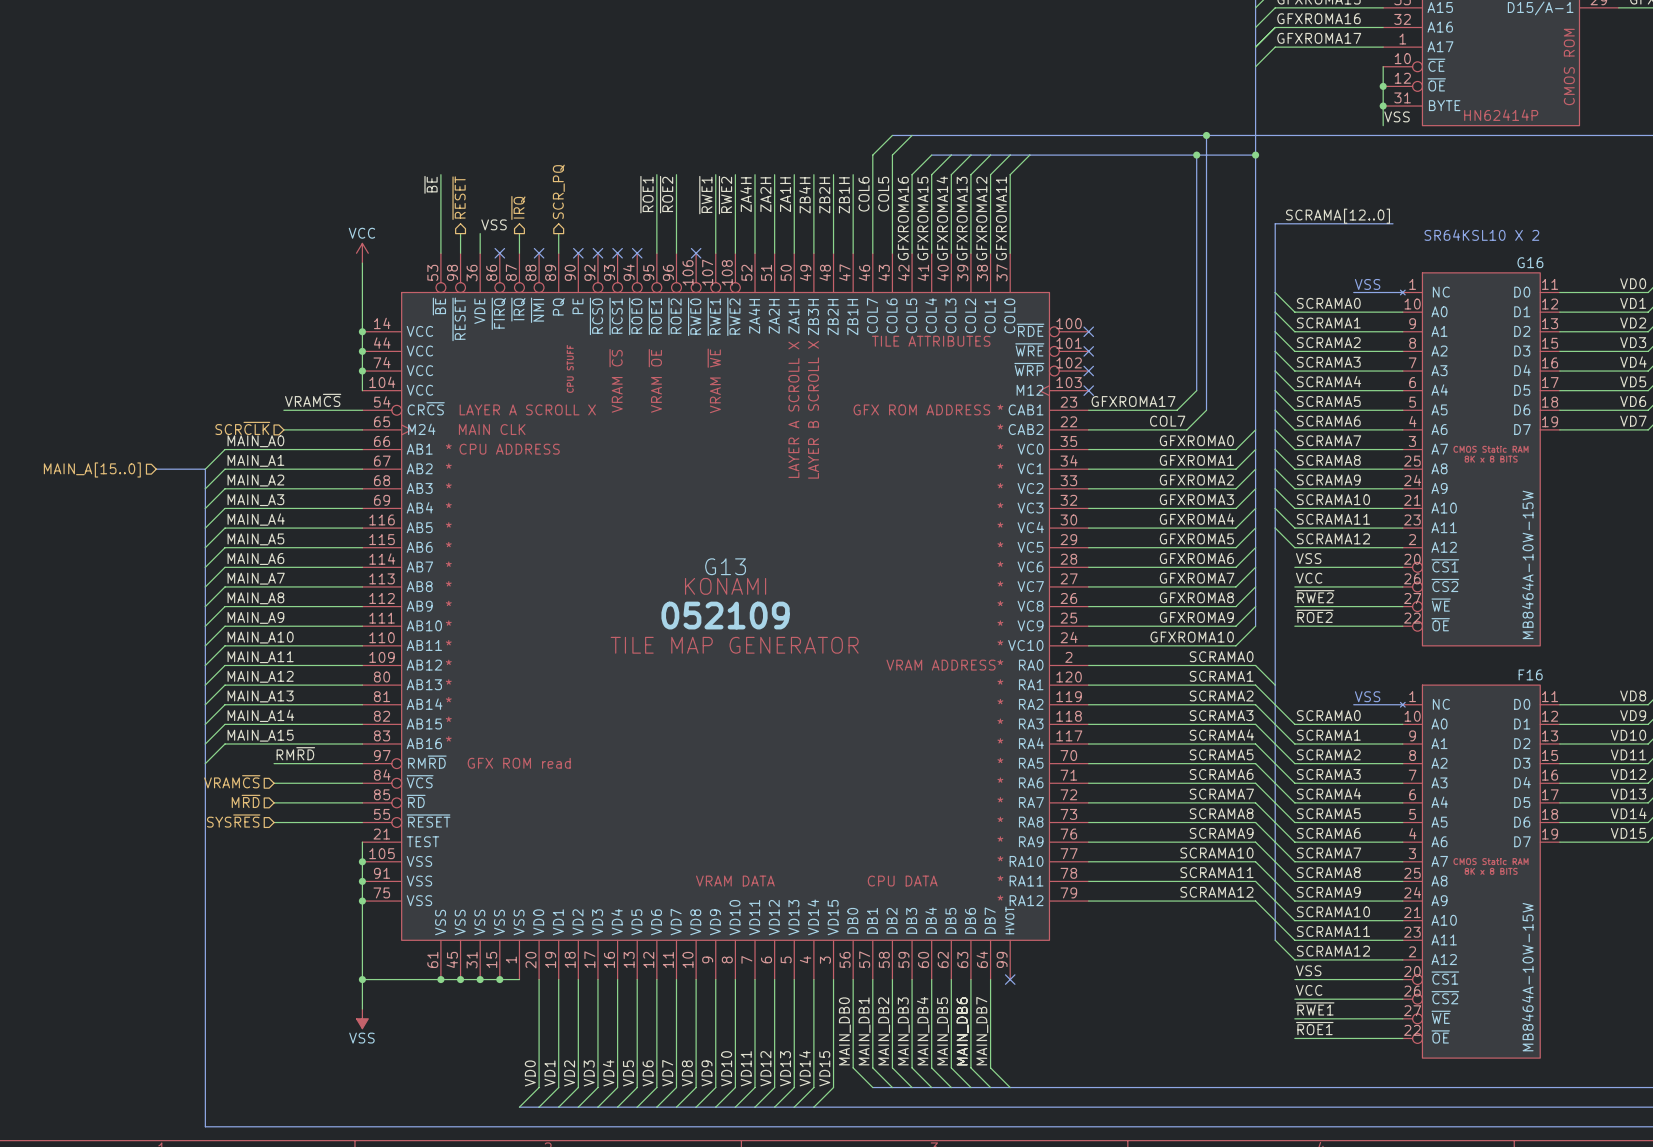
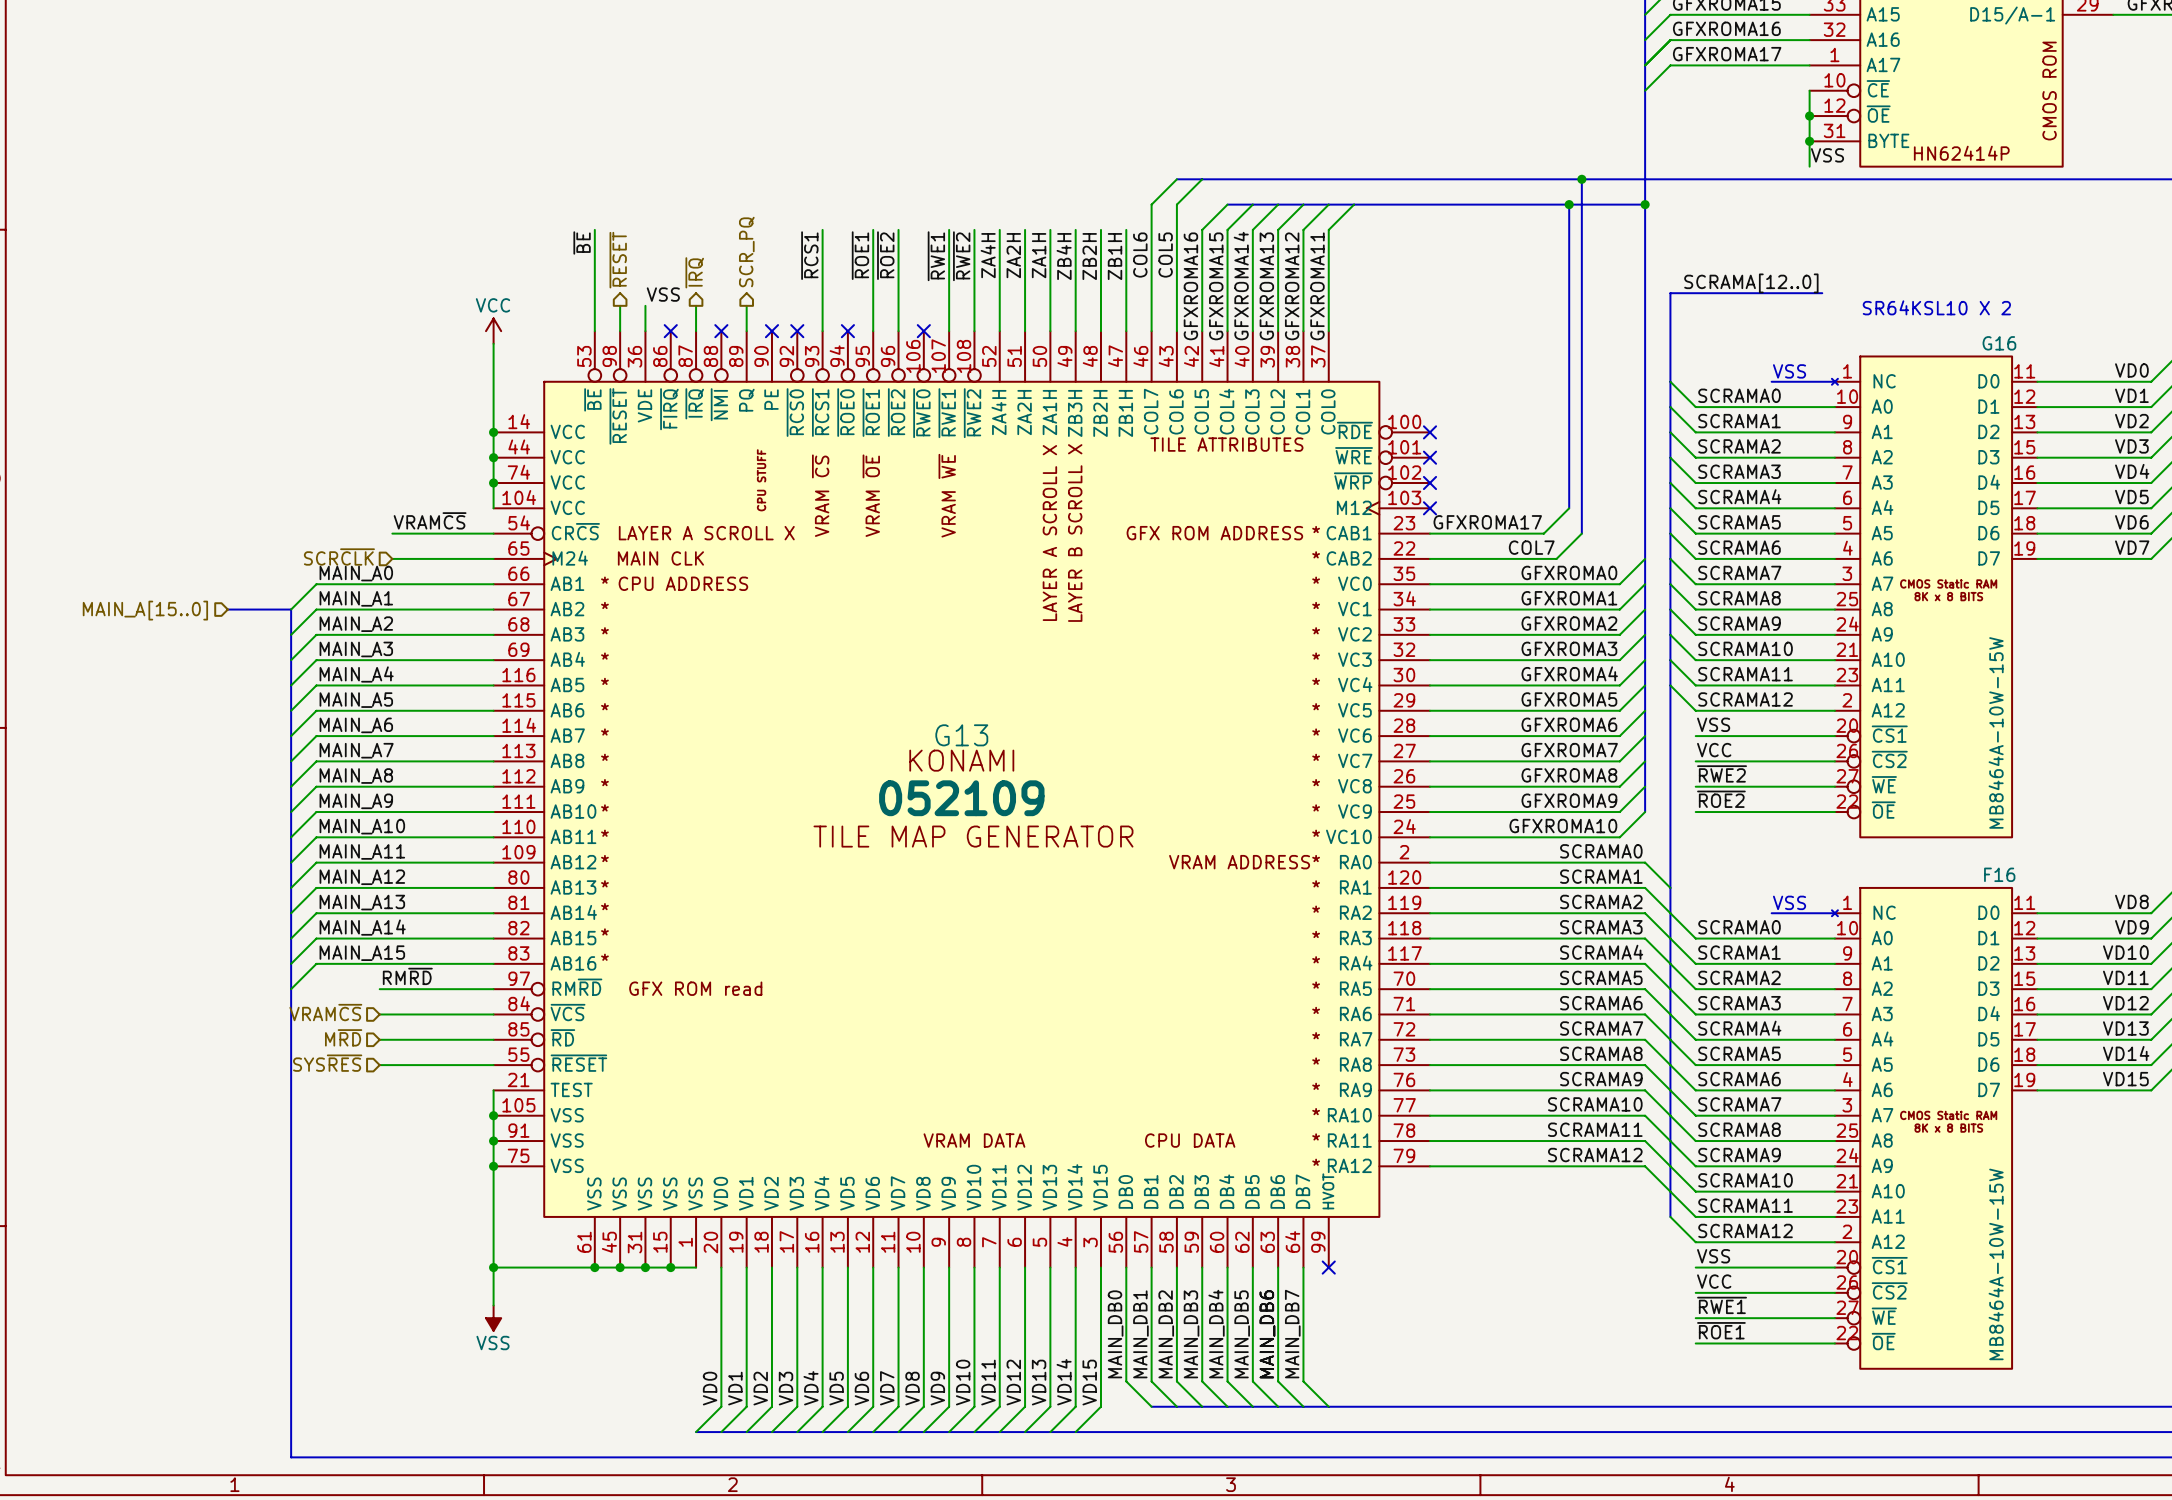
wire: none -> (822, 229) (822, 331)
label: none -> ~{RCS1} (809, 255)
no-connect mark: (617, 253) -> none

